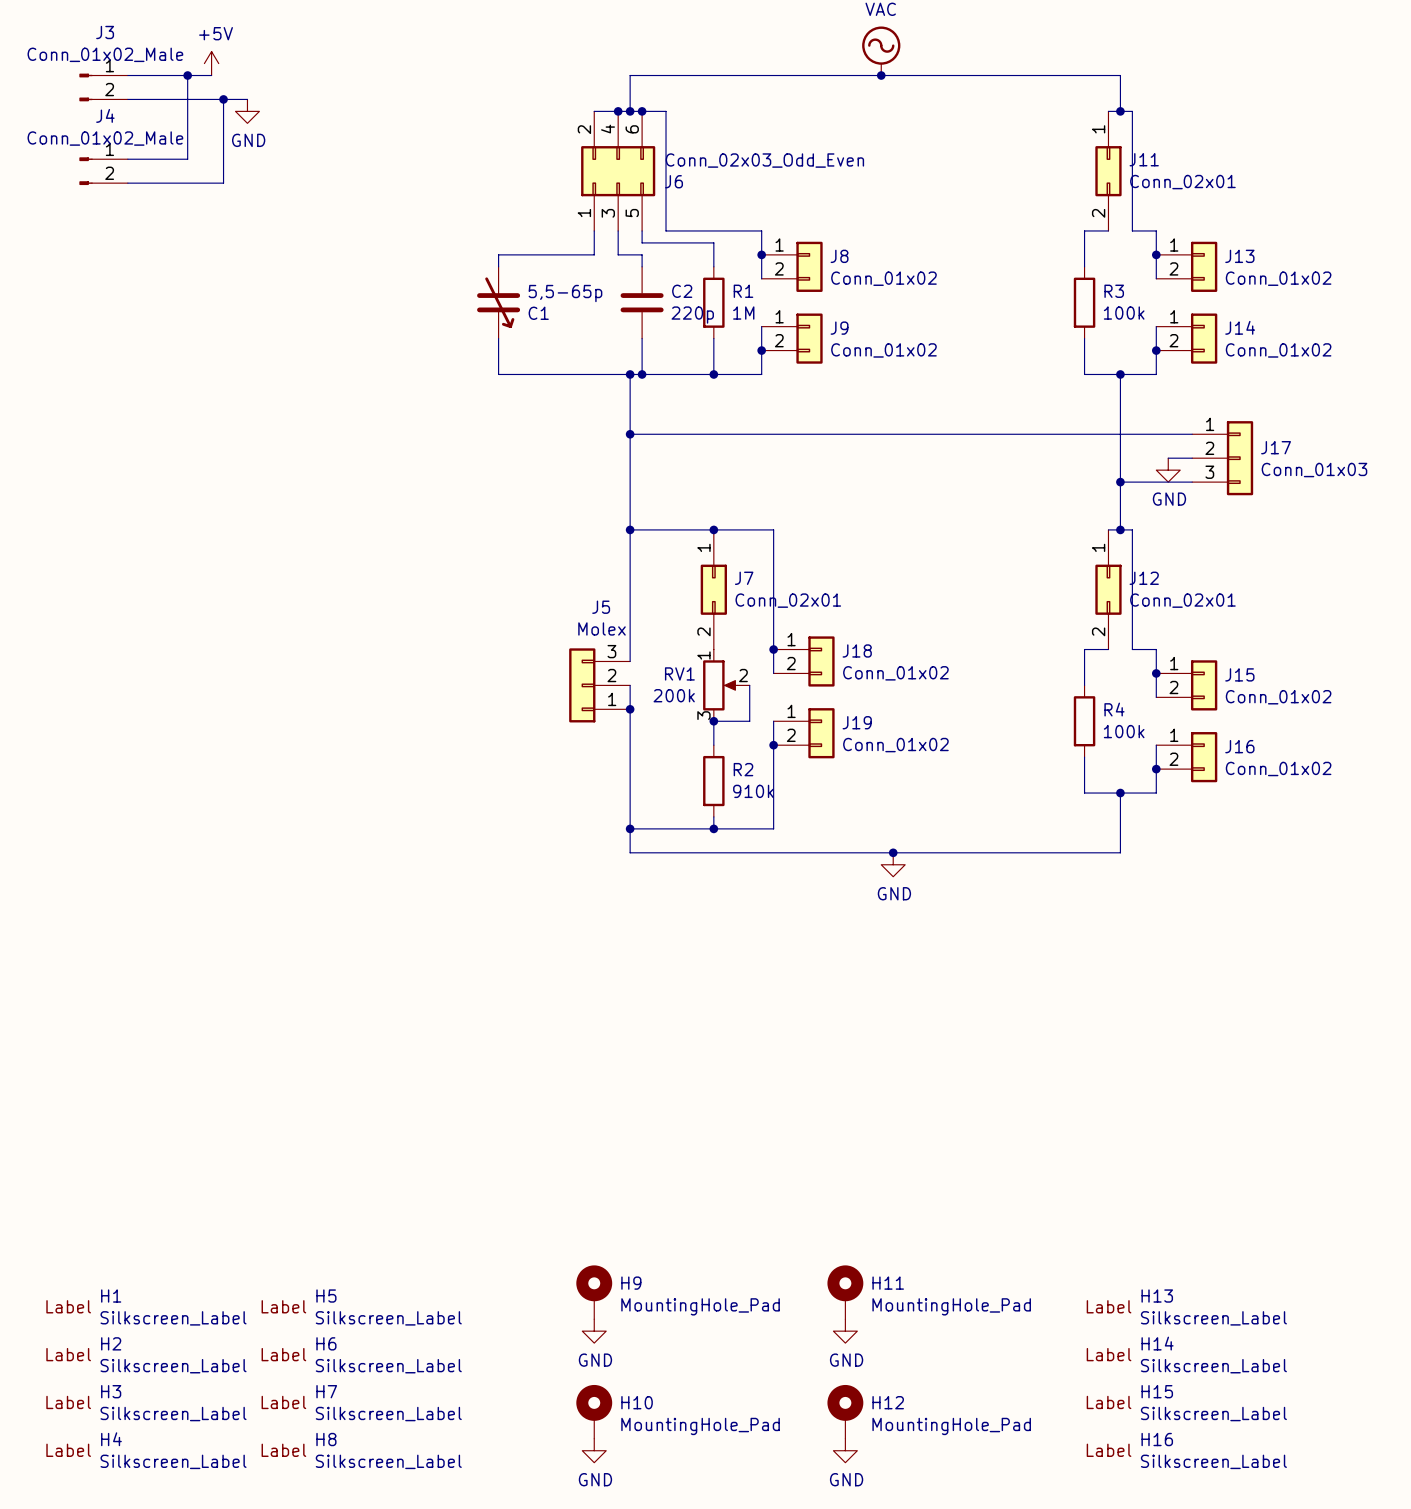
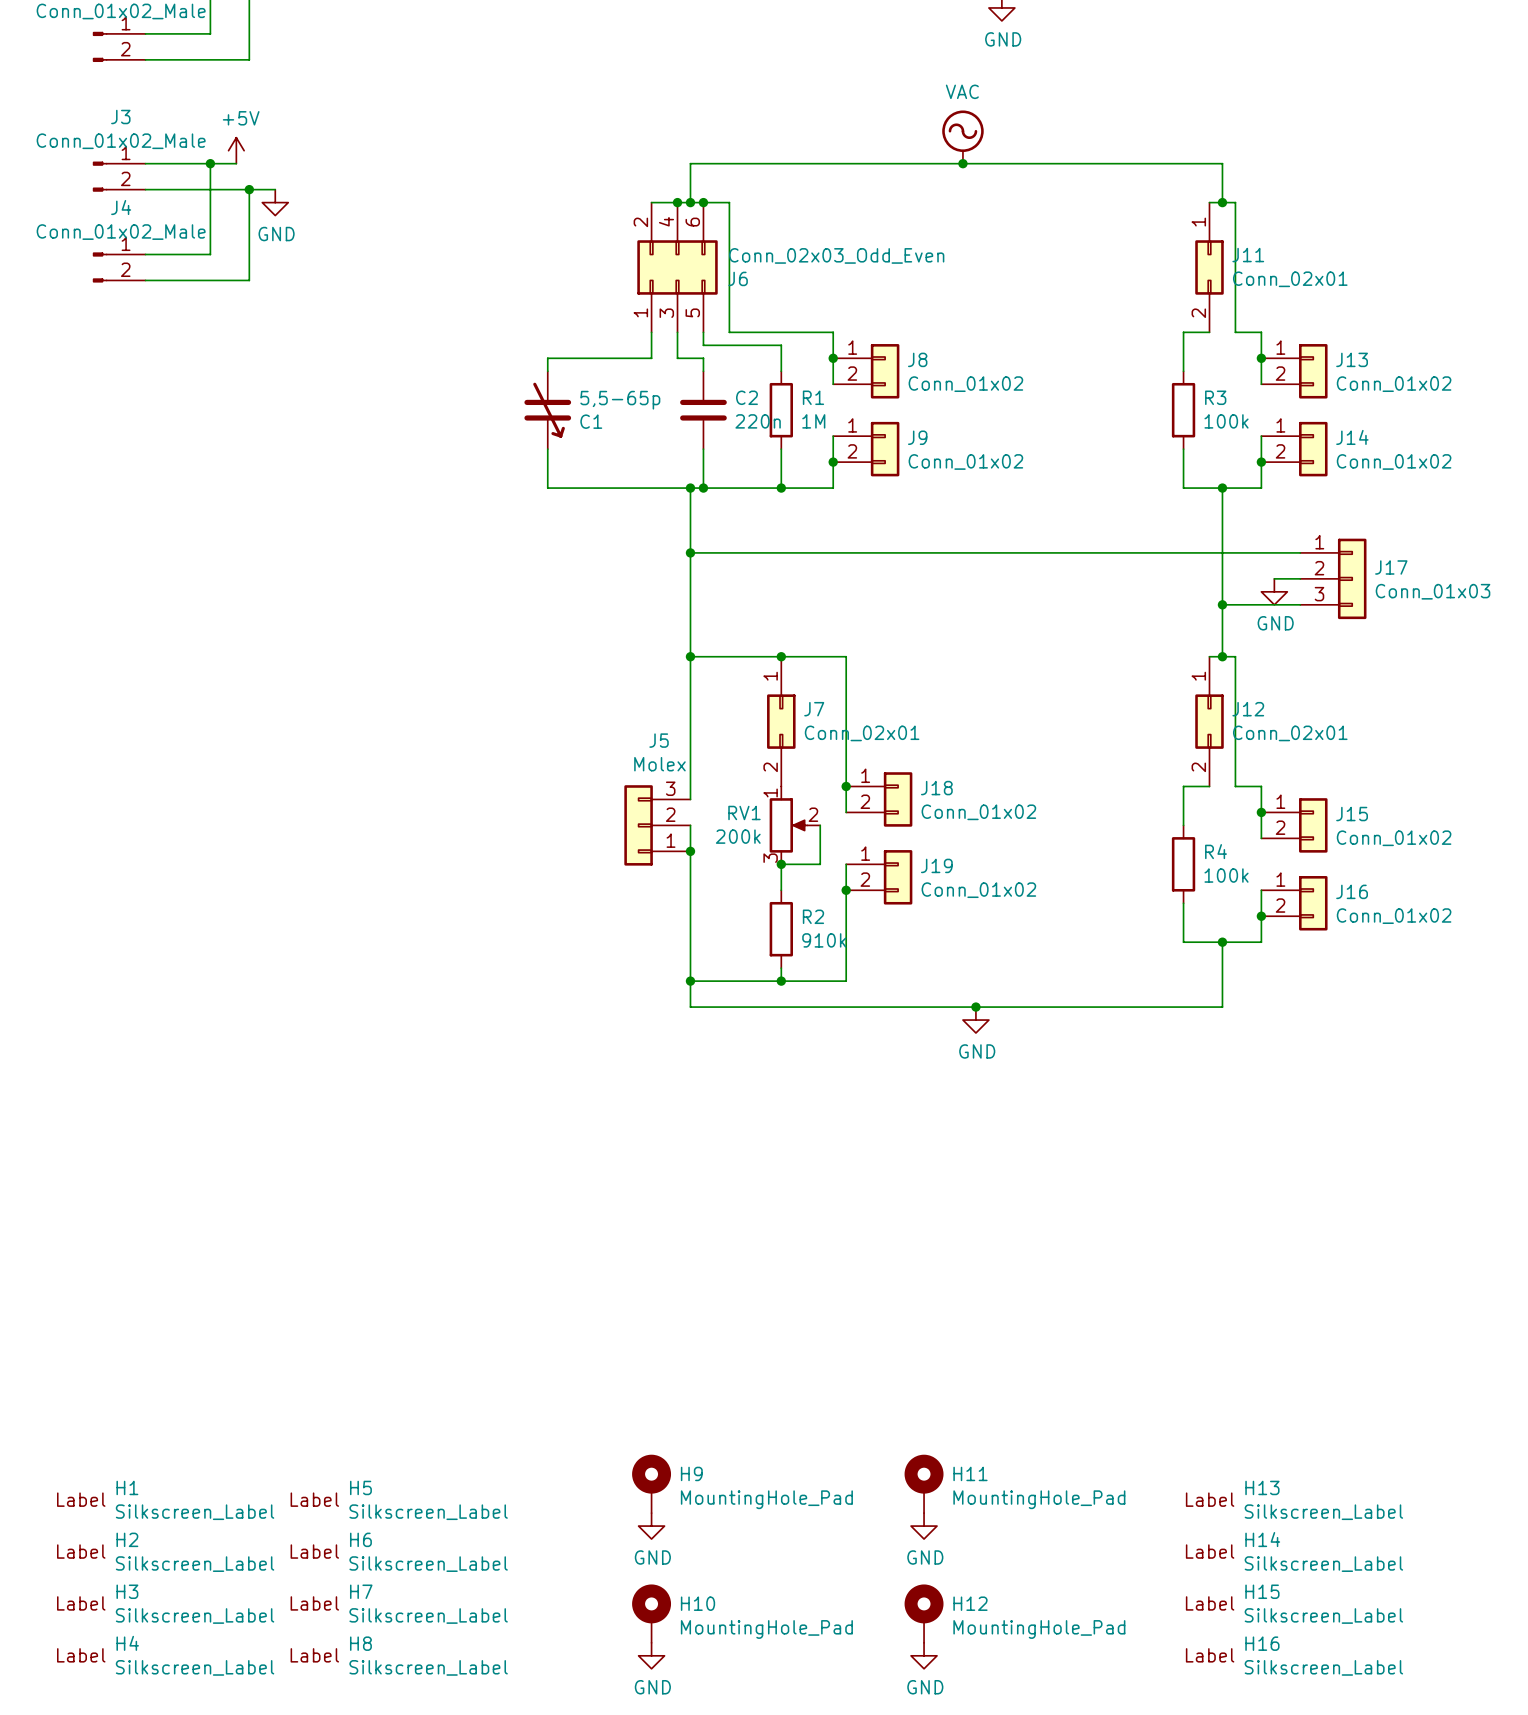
C2 value: 220p (692, 315) -> 220n (758, 421)

